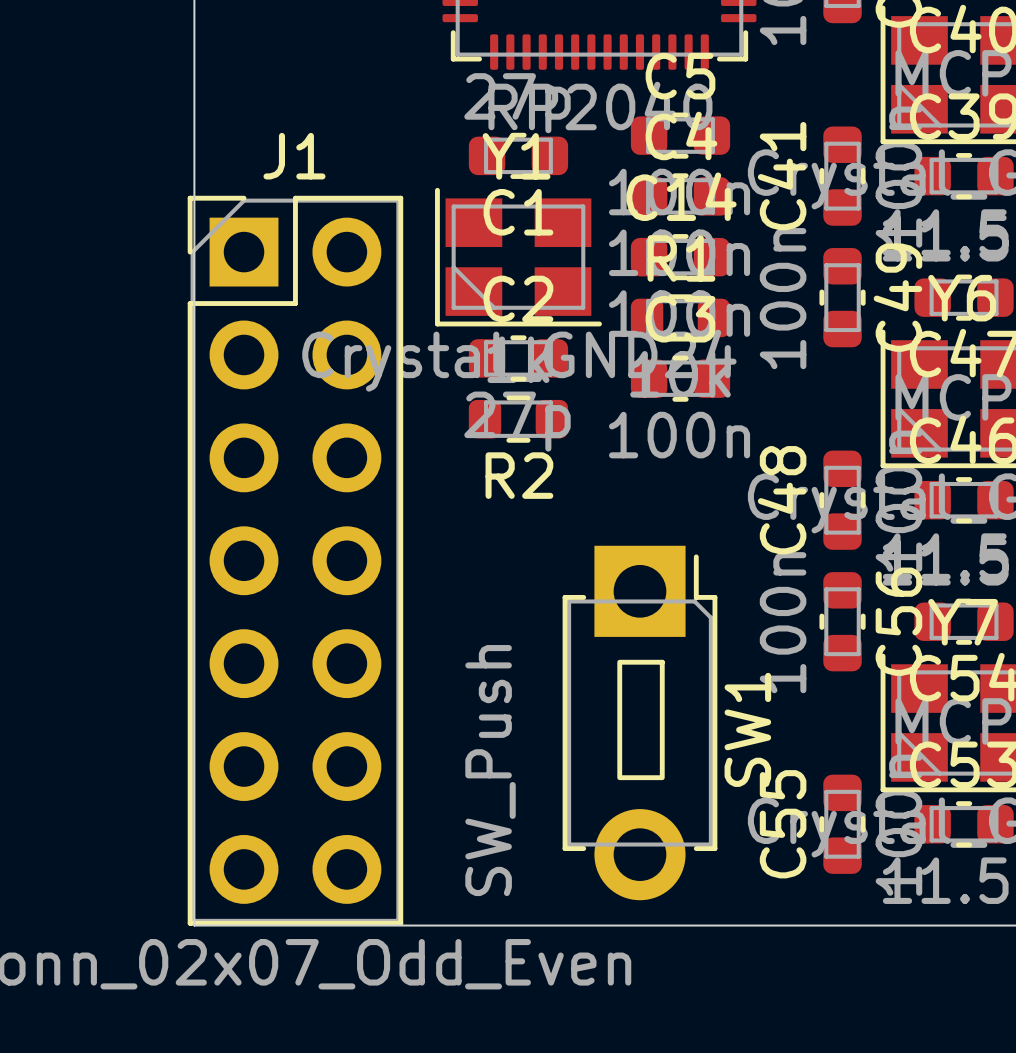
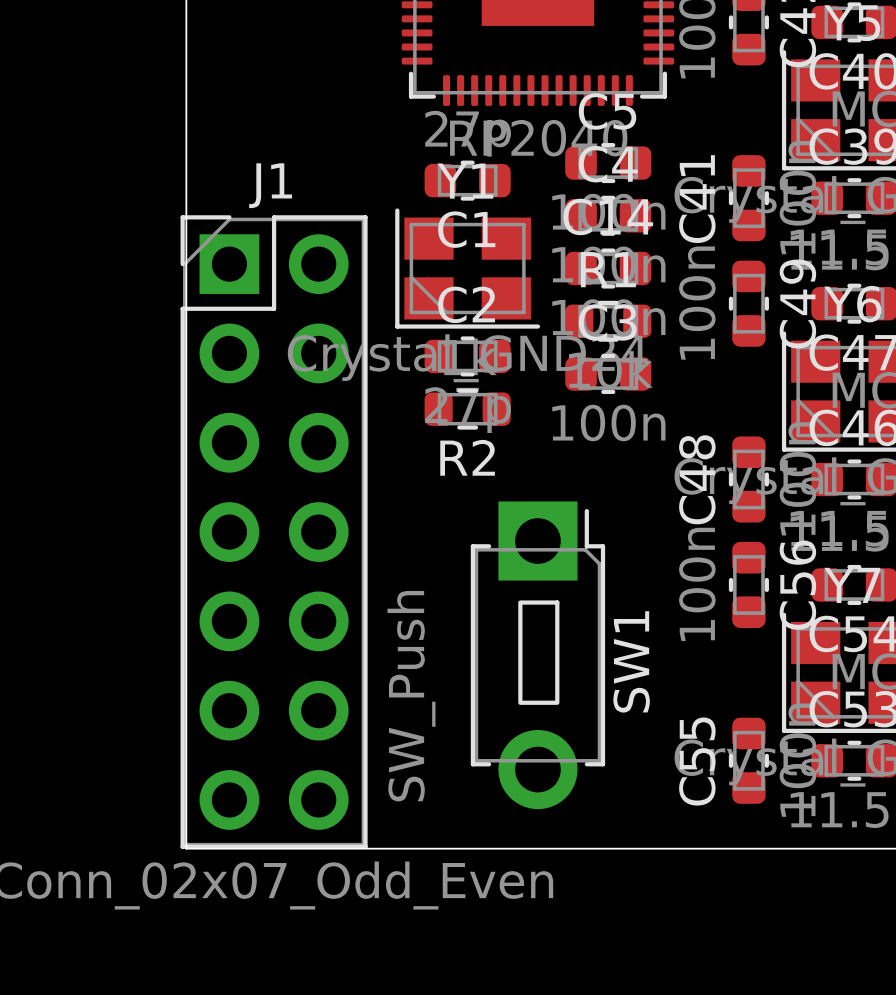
SW1 position: (639, 722) -> (537, 655)

